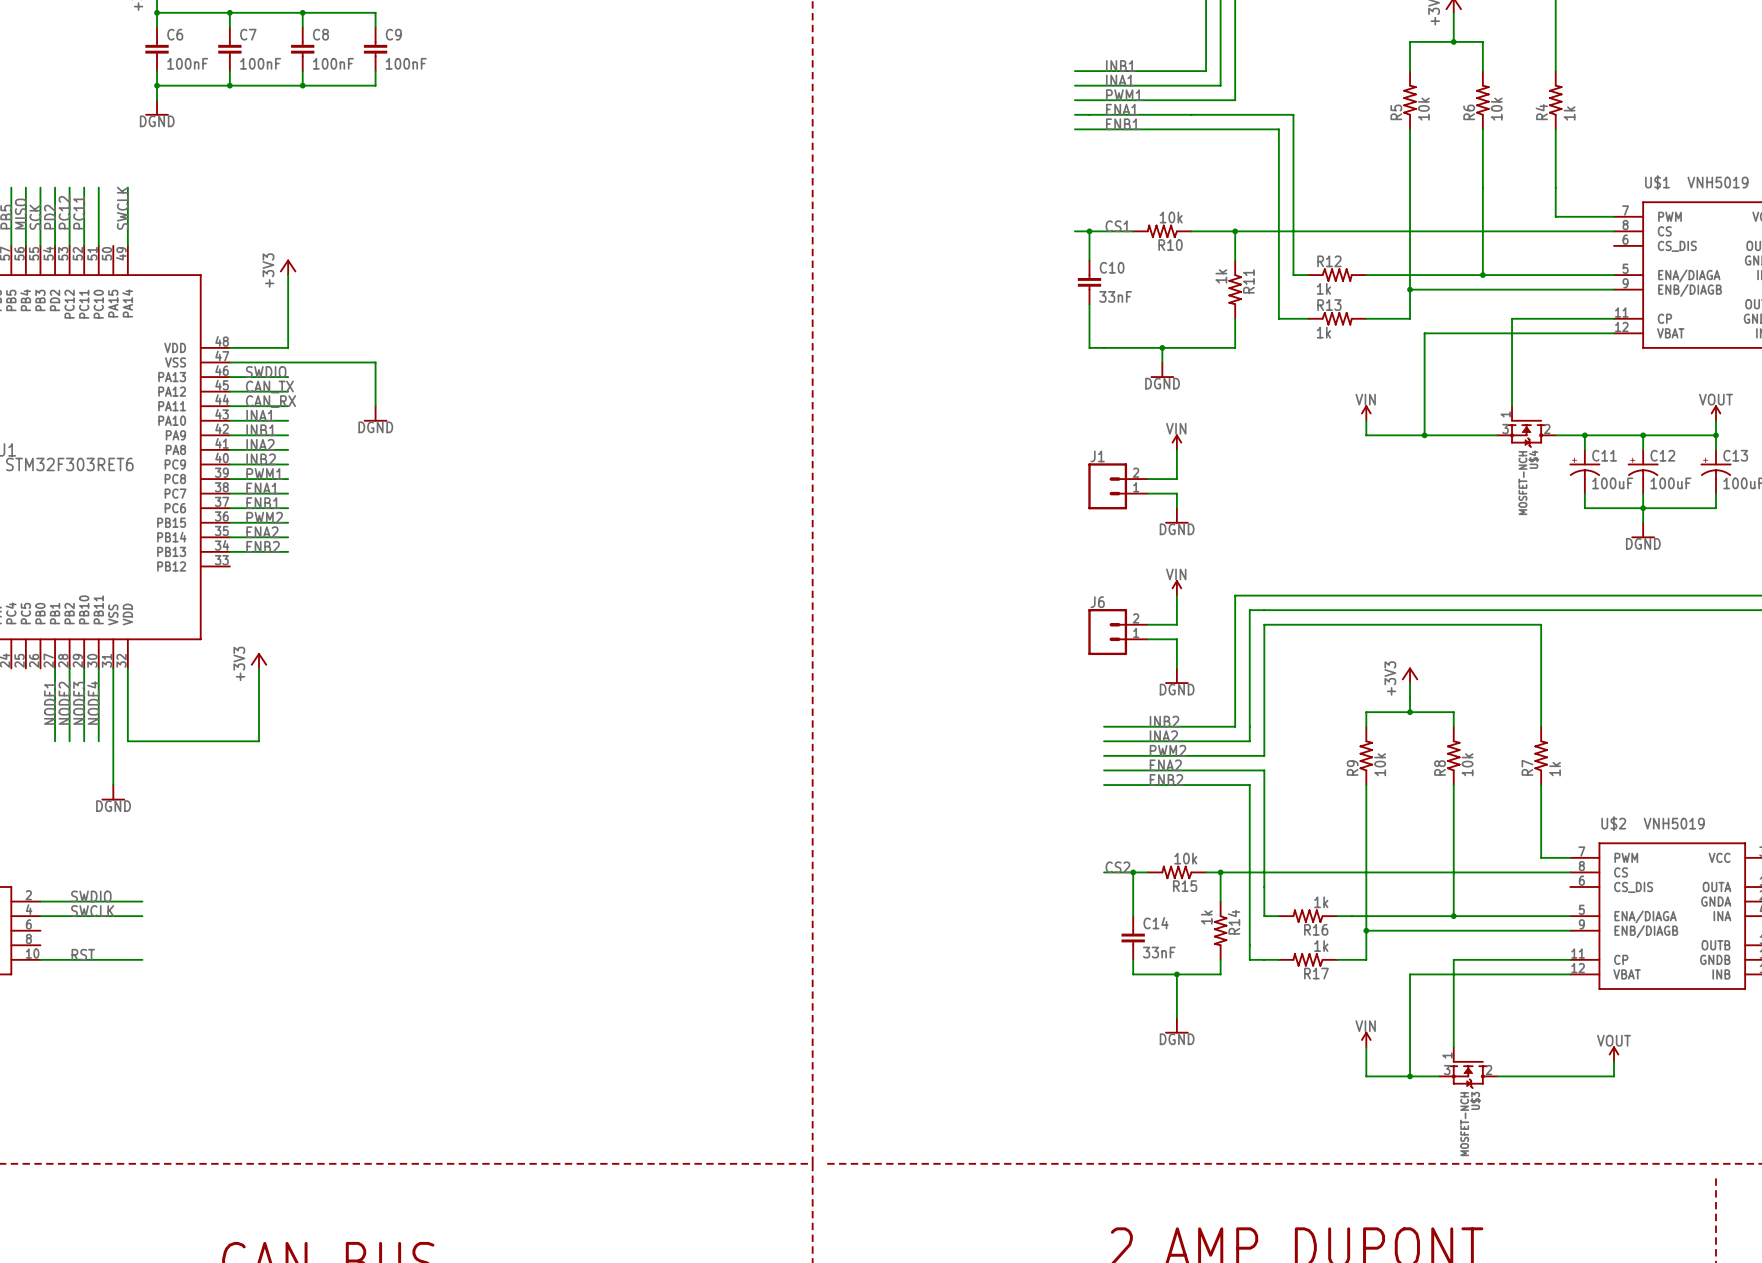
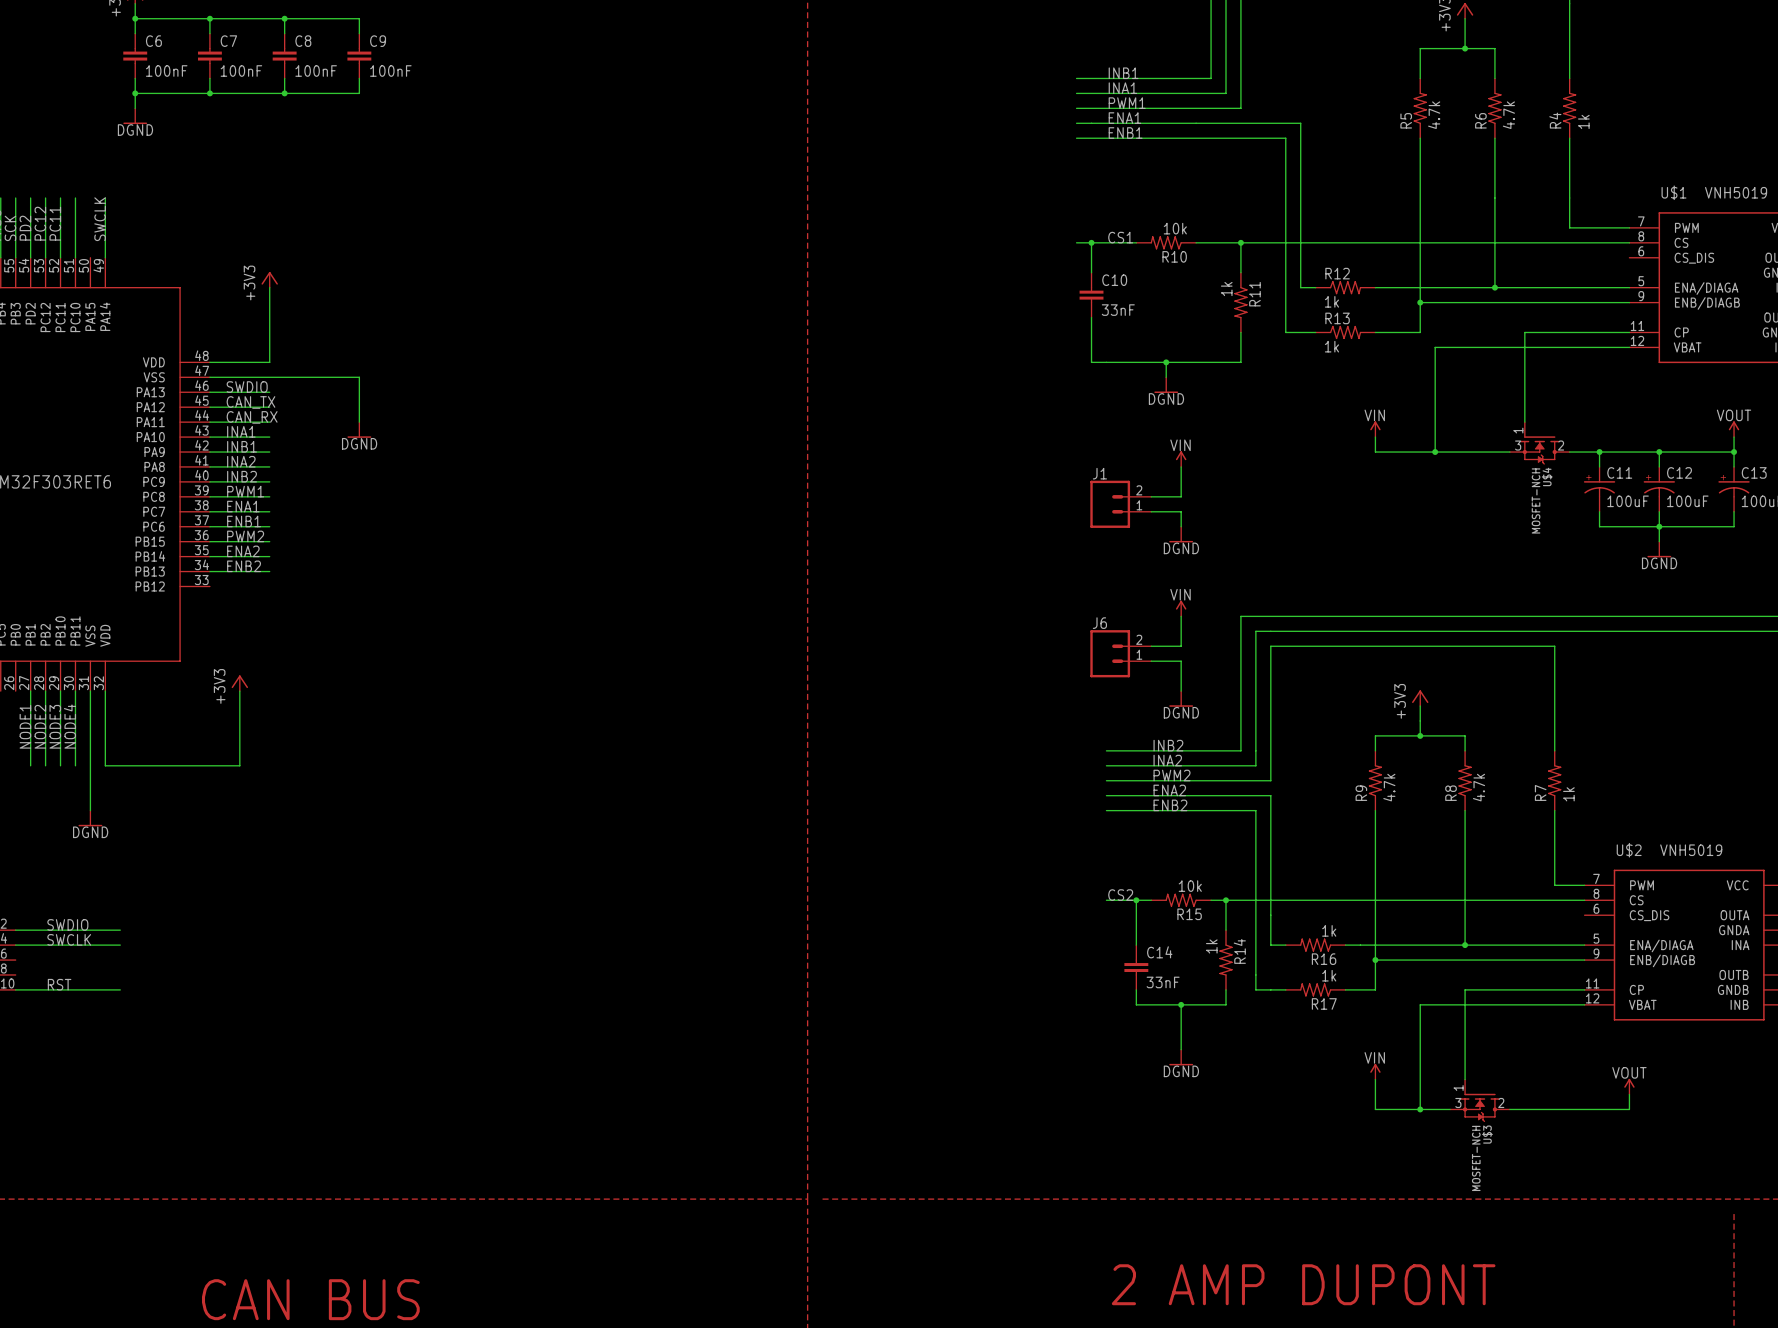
R5 value: 10k (1423, 109) -> 4.7k (1434, 115)
R6 value: 10k (1496, 109) -> 4.7k (1508, 115)
R9 value: 10k (1380, 764) -> 4.7k (1389, 787)
R8 value: 10k (1467, 764) -> 4.7k (1479, 787)

